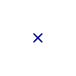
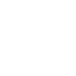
no-connect mark: (37, 37) -> none

